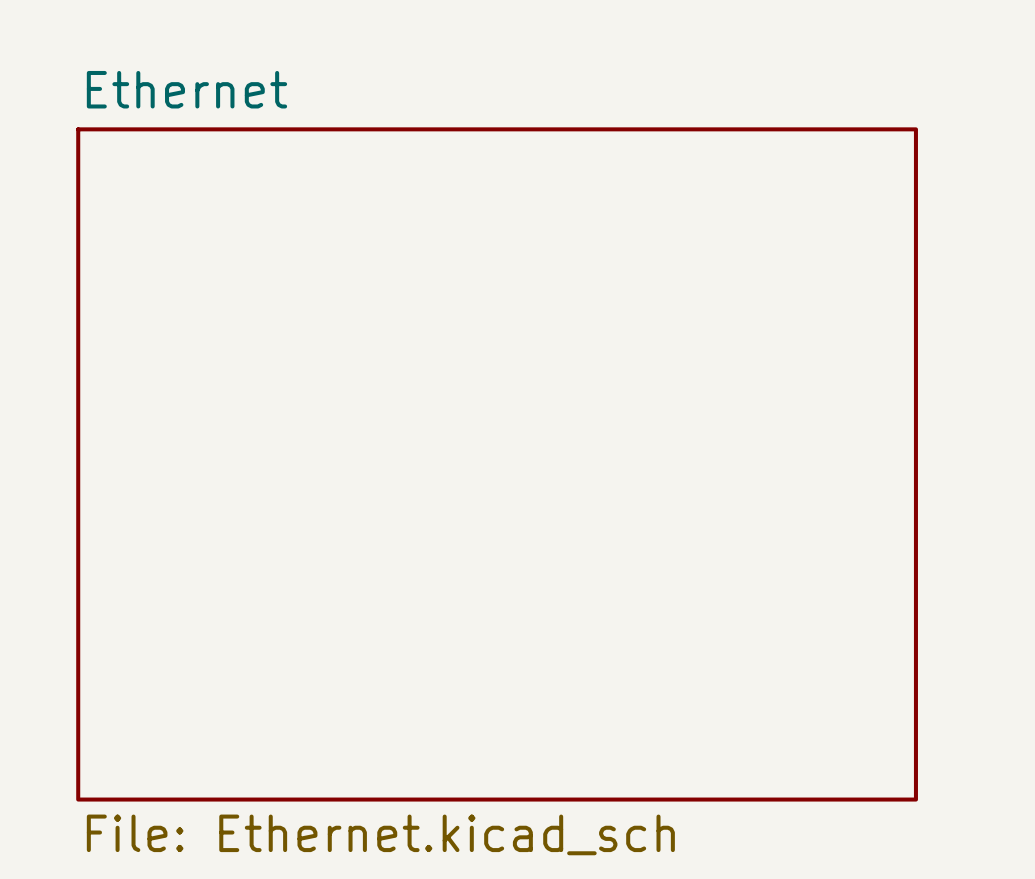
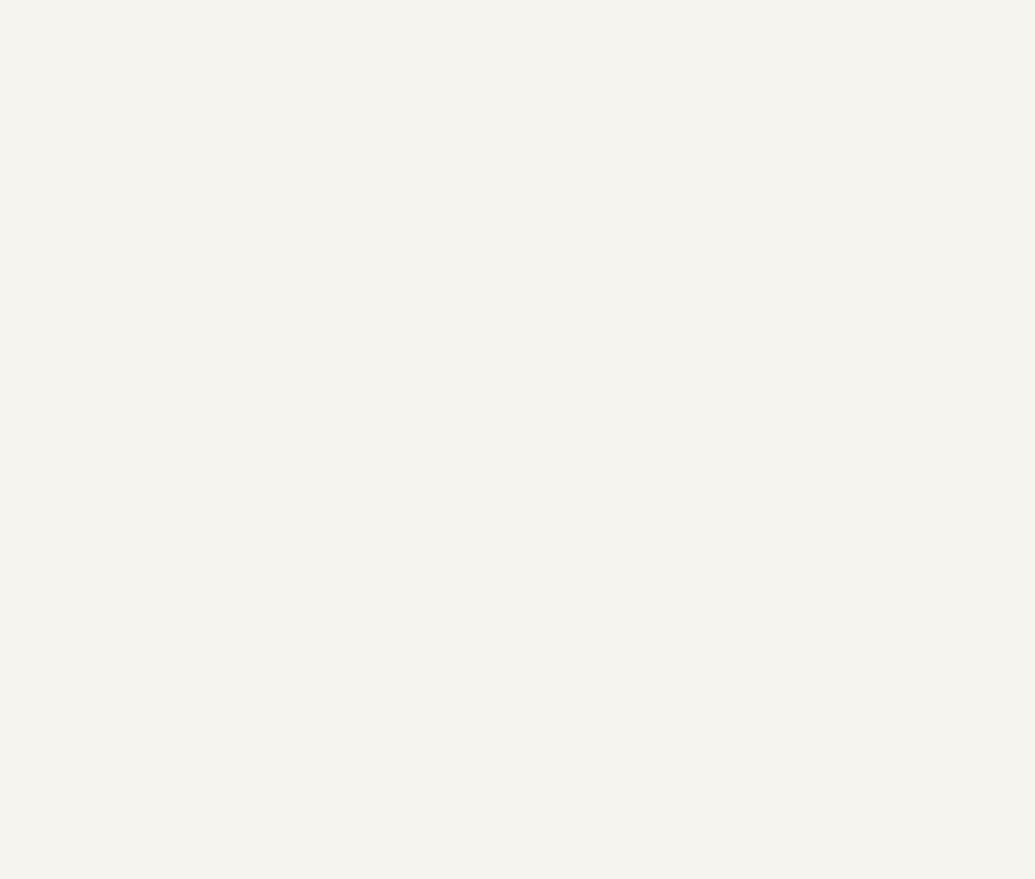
sheet Ethernet: File: Ethernet.kicad_sch (497, 464) -> none

